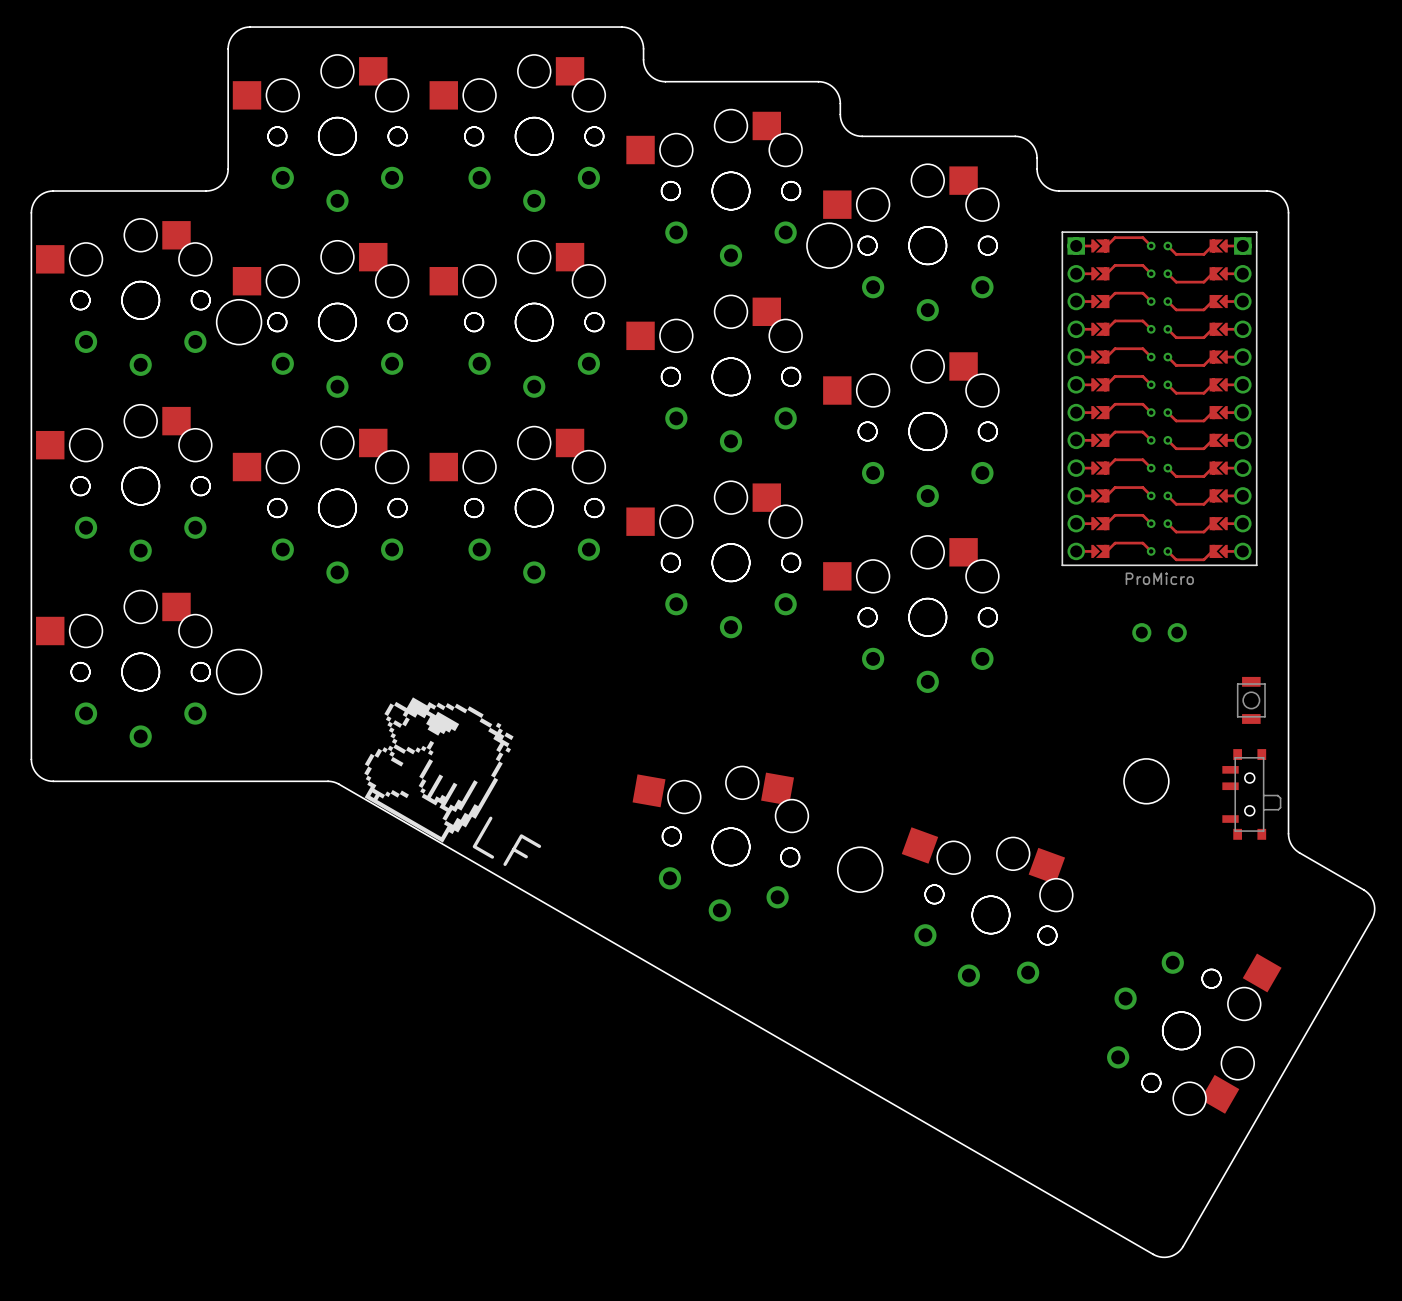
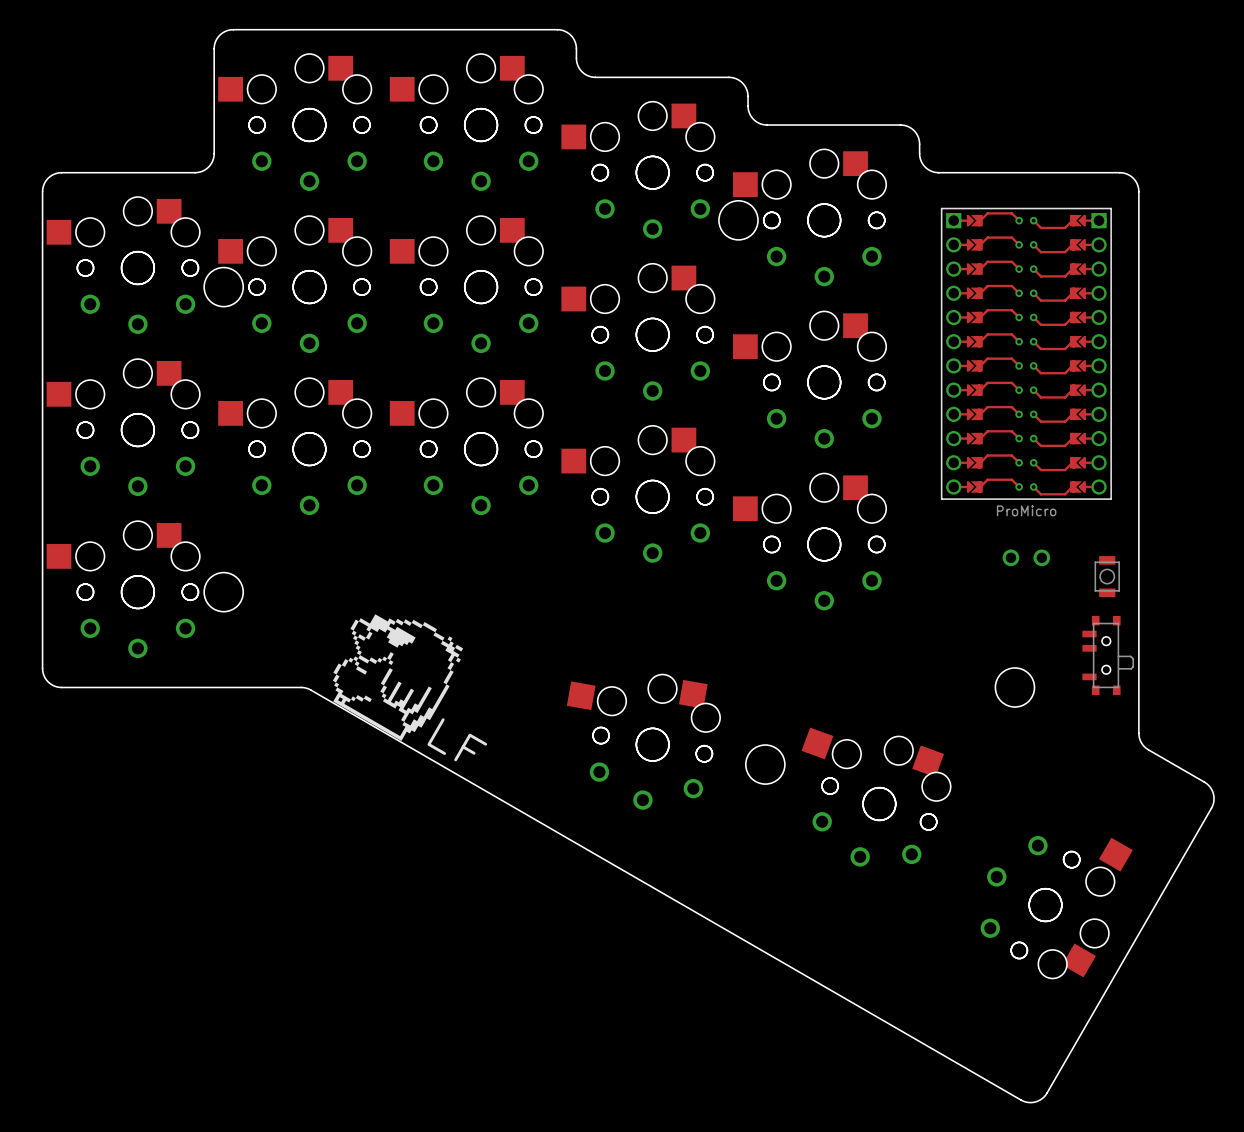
part position: (1251, 700) -> (1107, 576)
part position: (1251, 794) -> (1108, 655)

